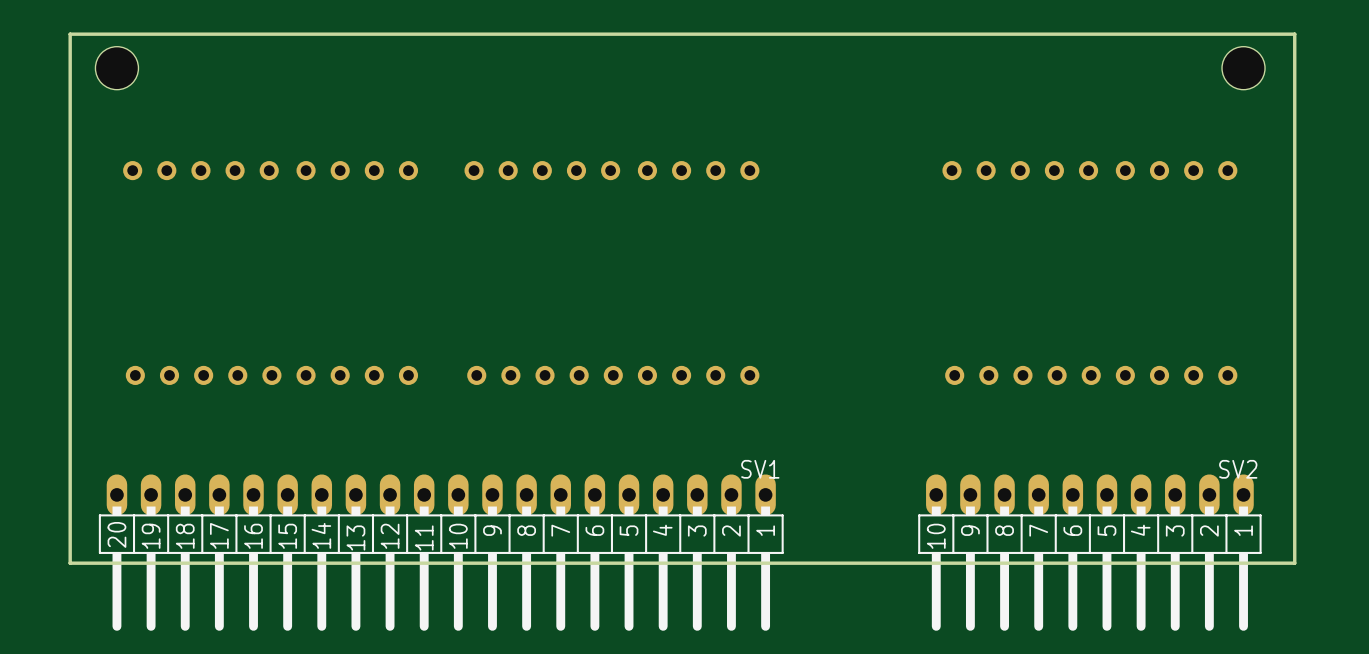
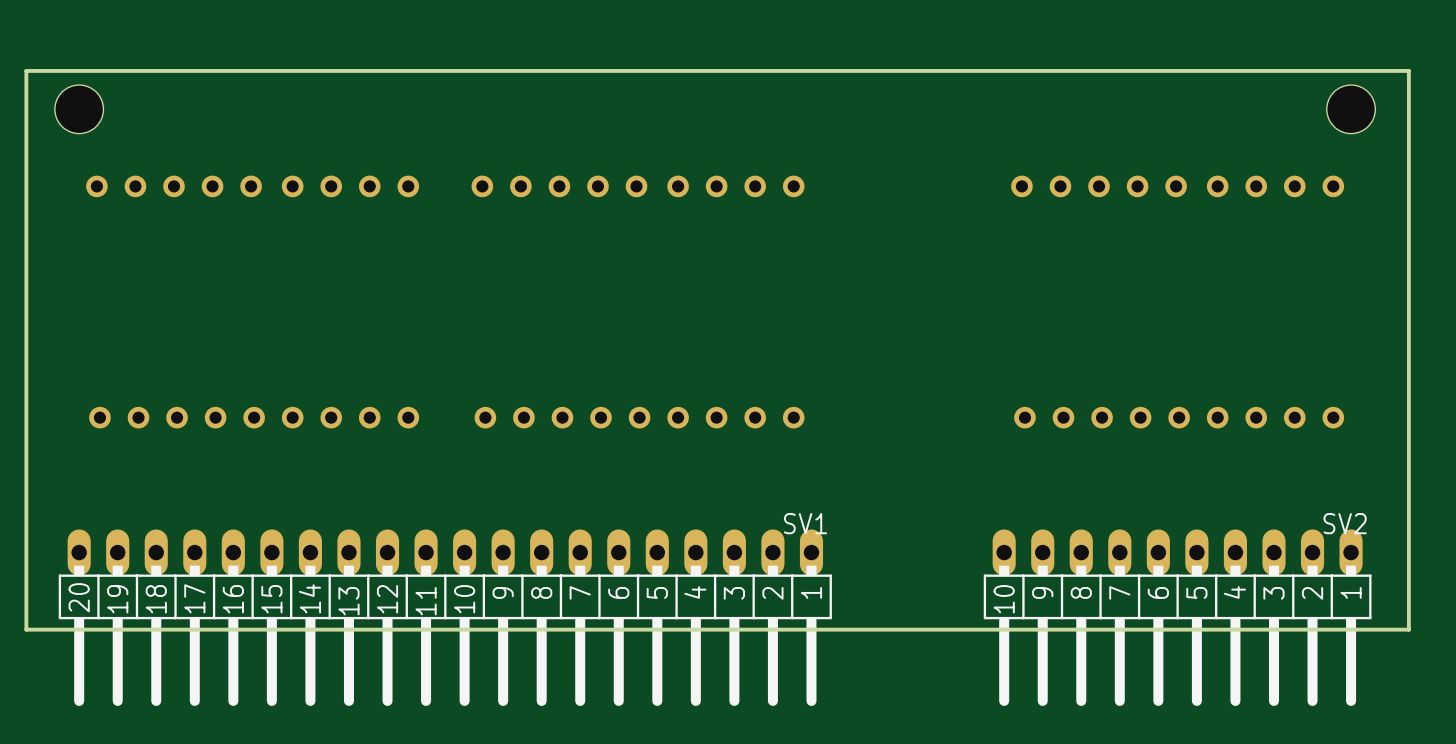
hole position: (116, 68) -> (79, 109)
hole position: (1243, 68) -> (1351, 109)
board edge: (1294, 68) (1294, 34) (70, 34) (70, 68) -> (1408, 70) (26, 70)

